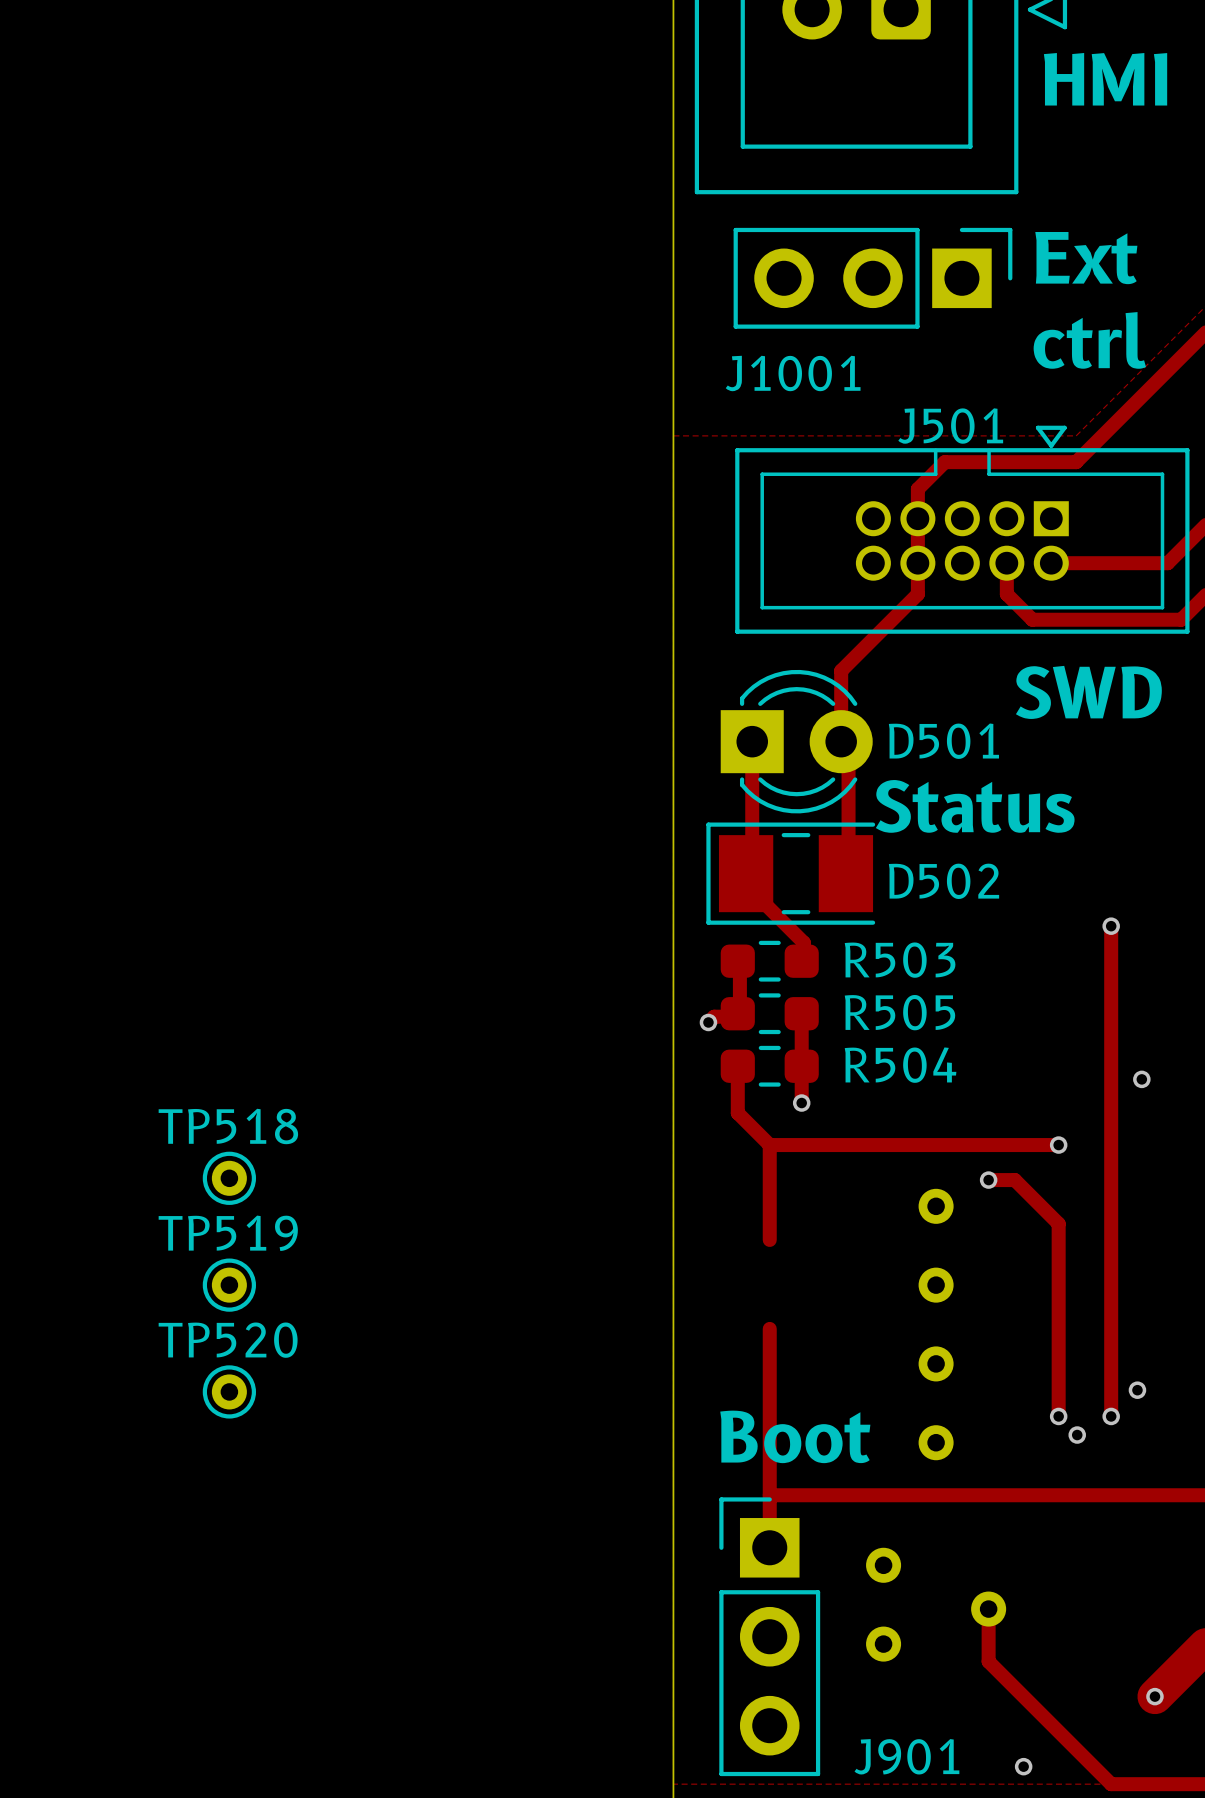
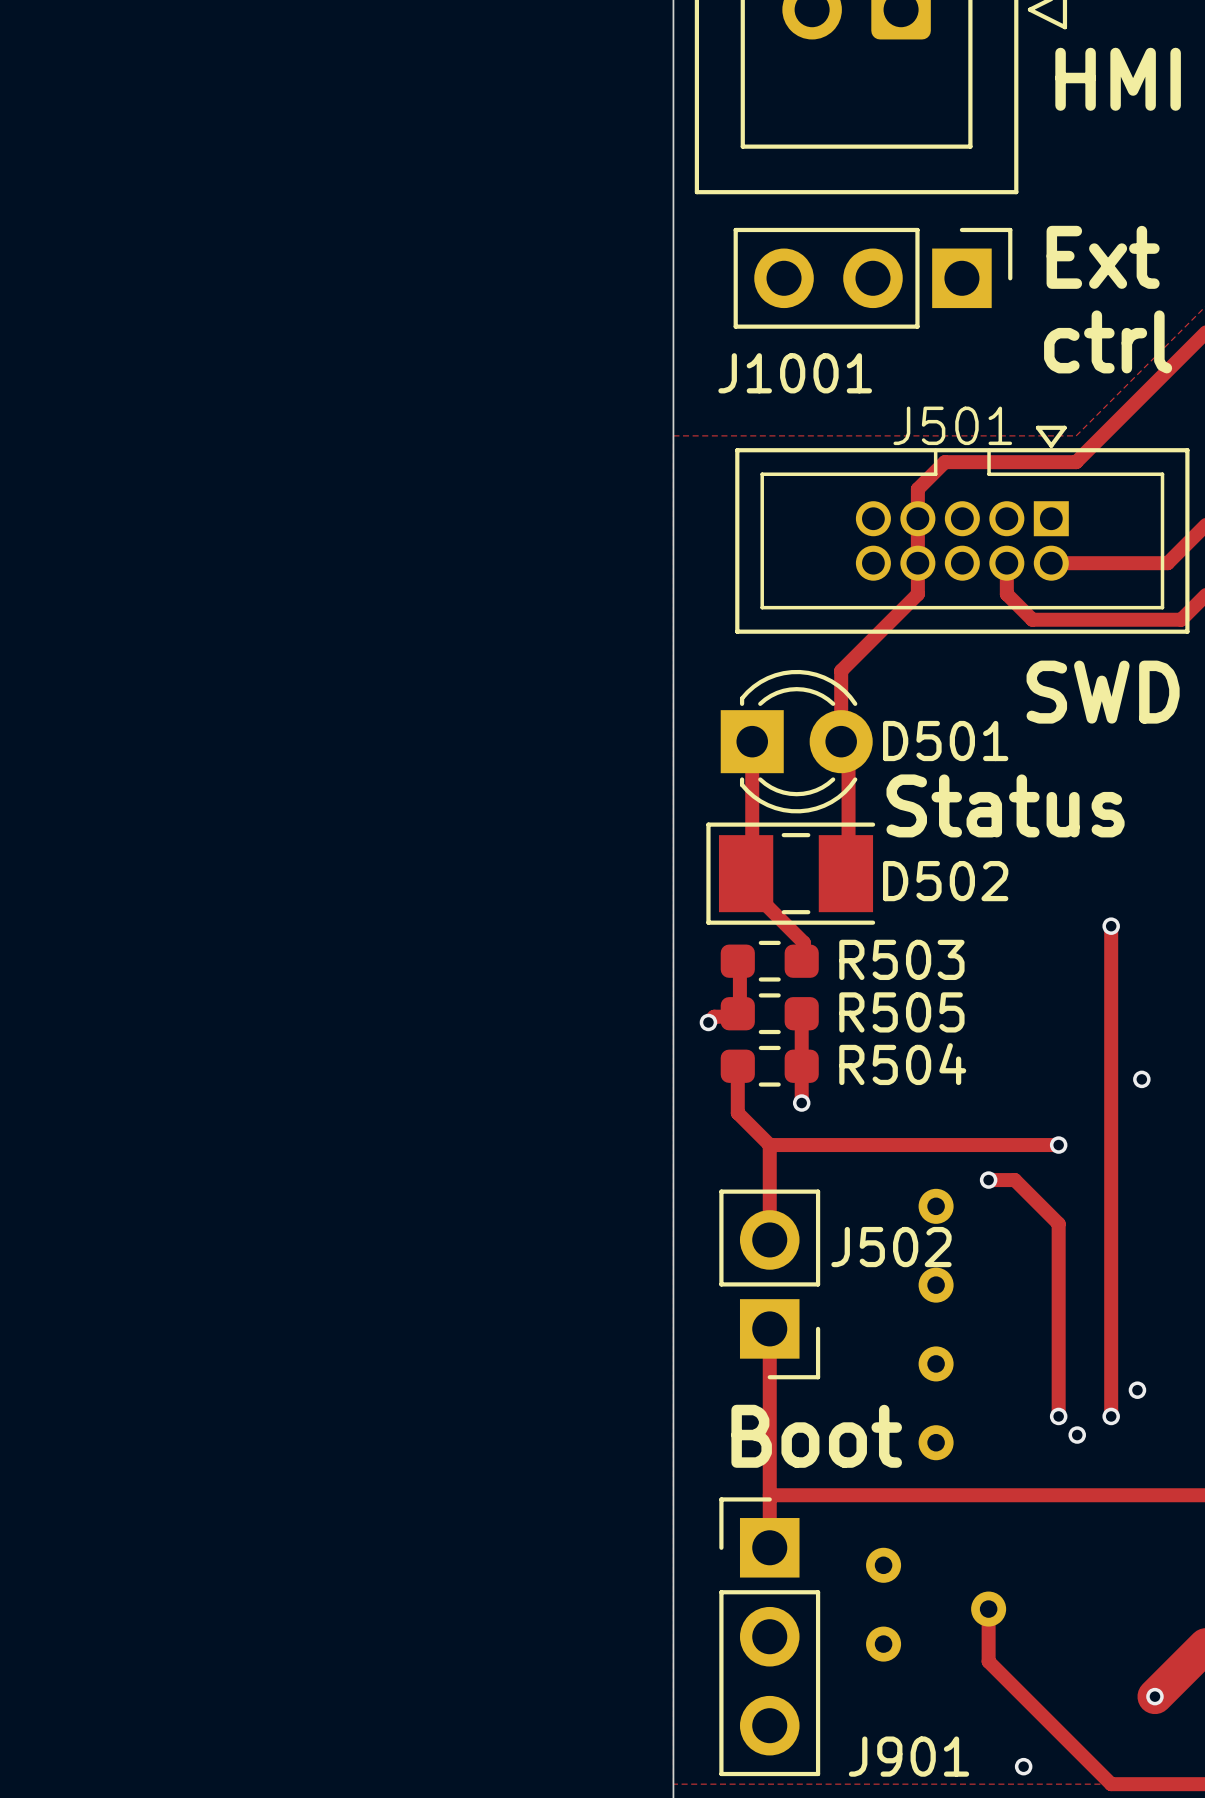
TP518: (229, 1178) -> none
J502: none -> (769, 1284)
TP519: (229, 1285) -> none
TP520: (229, 1391) -> none

